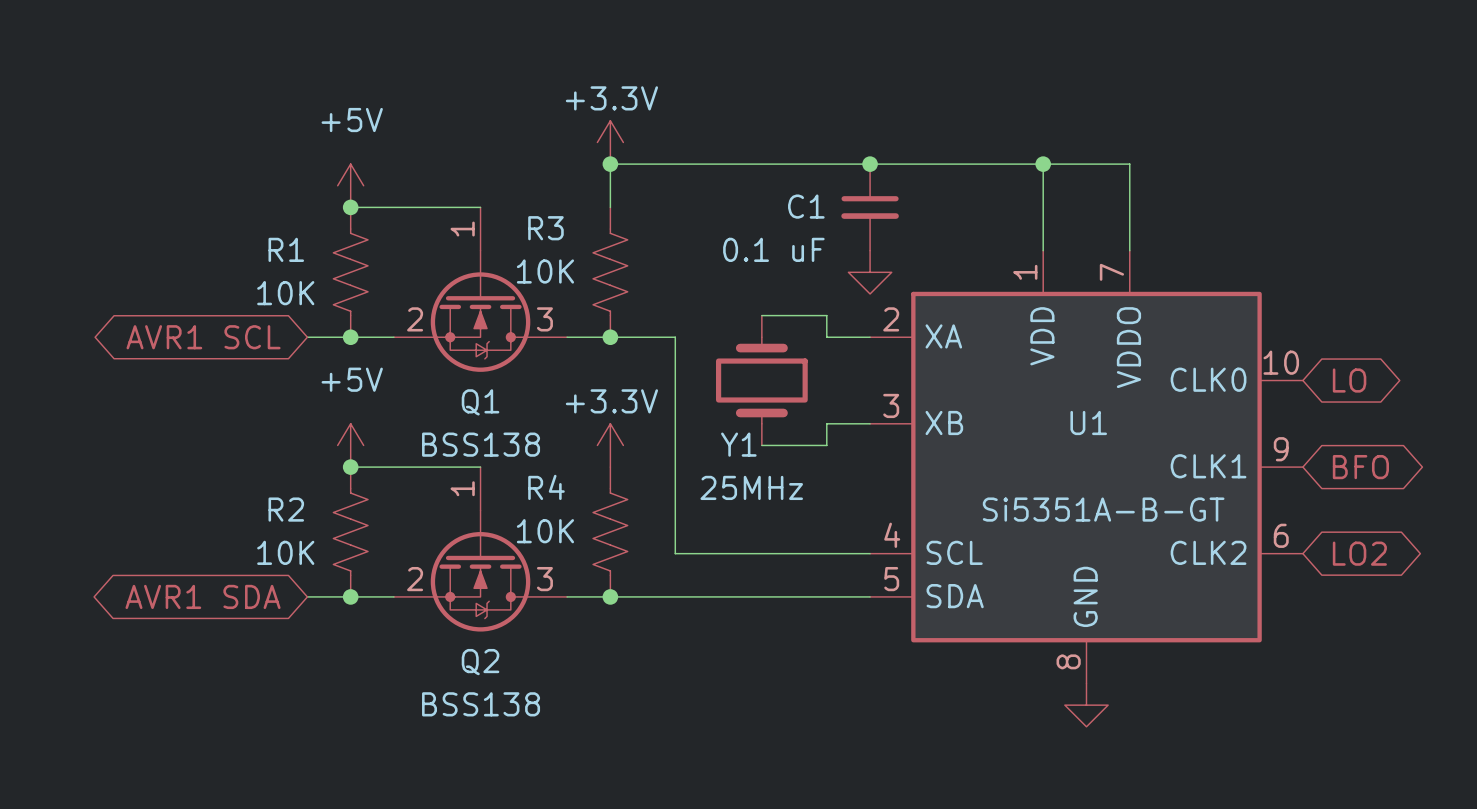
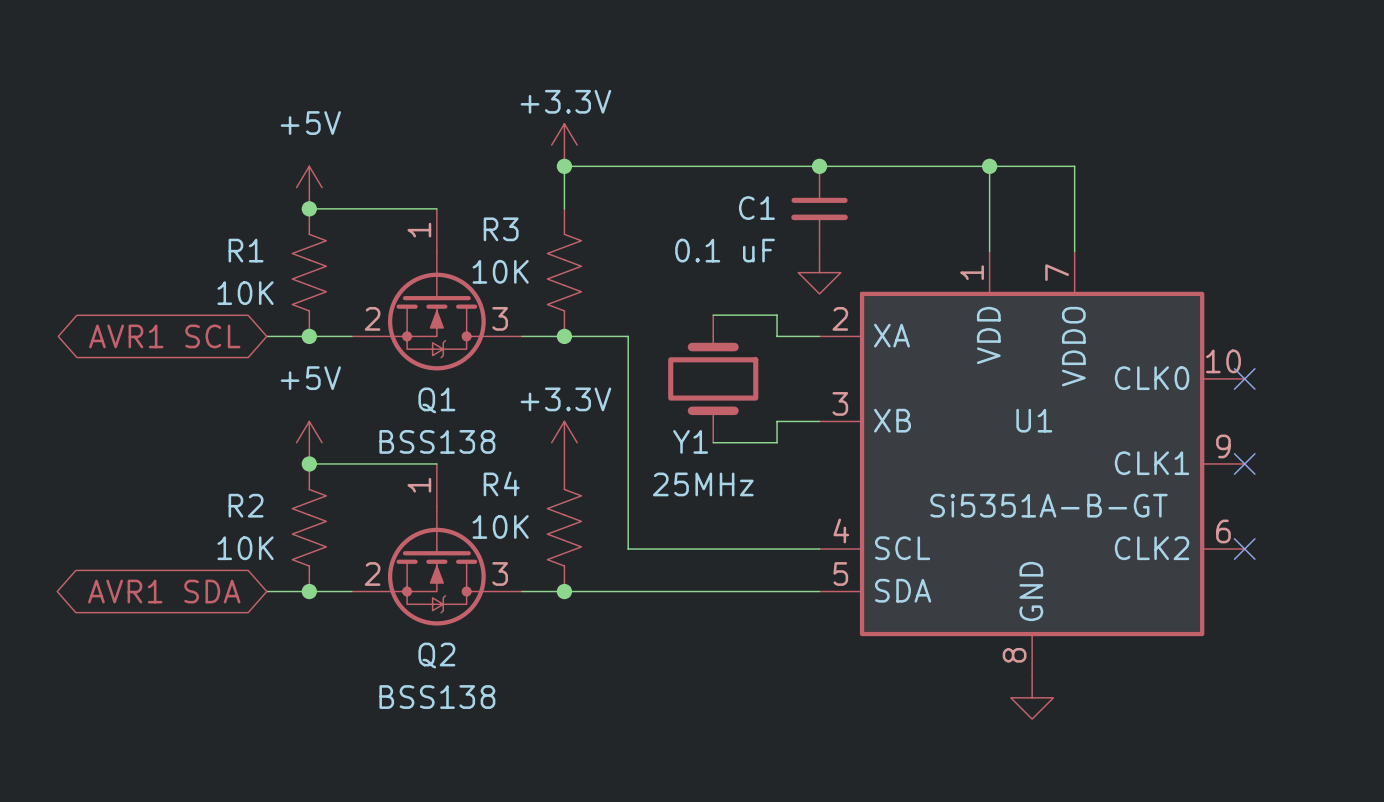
no-connect mark: none -> (1244, 378)
global label: LO (1349, 380) -> none
no-connect mark: none -> (1244, 463)
global label: BFO (1360, 467) -> none
no-connect mark: none -> (1244, 549)
global label: LO2 (1359, 553) -> none

